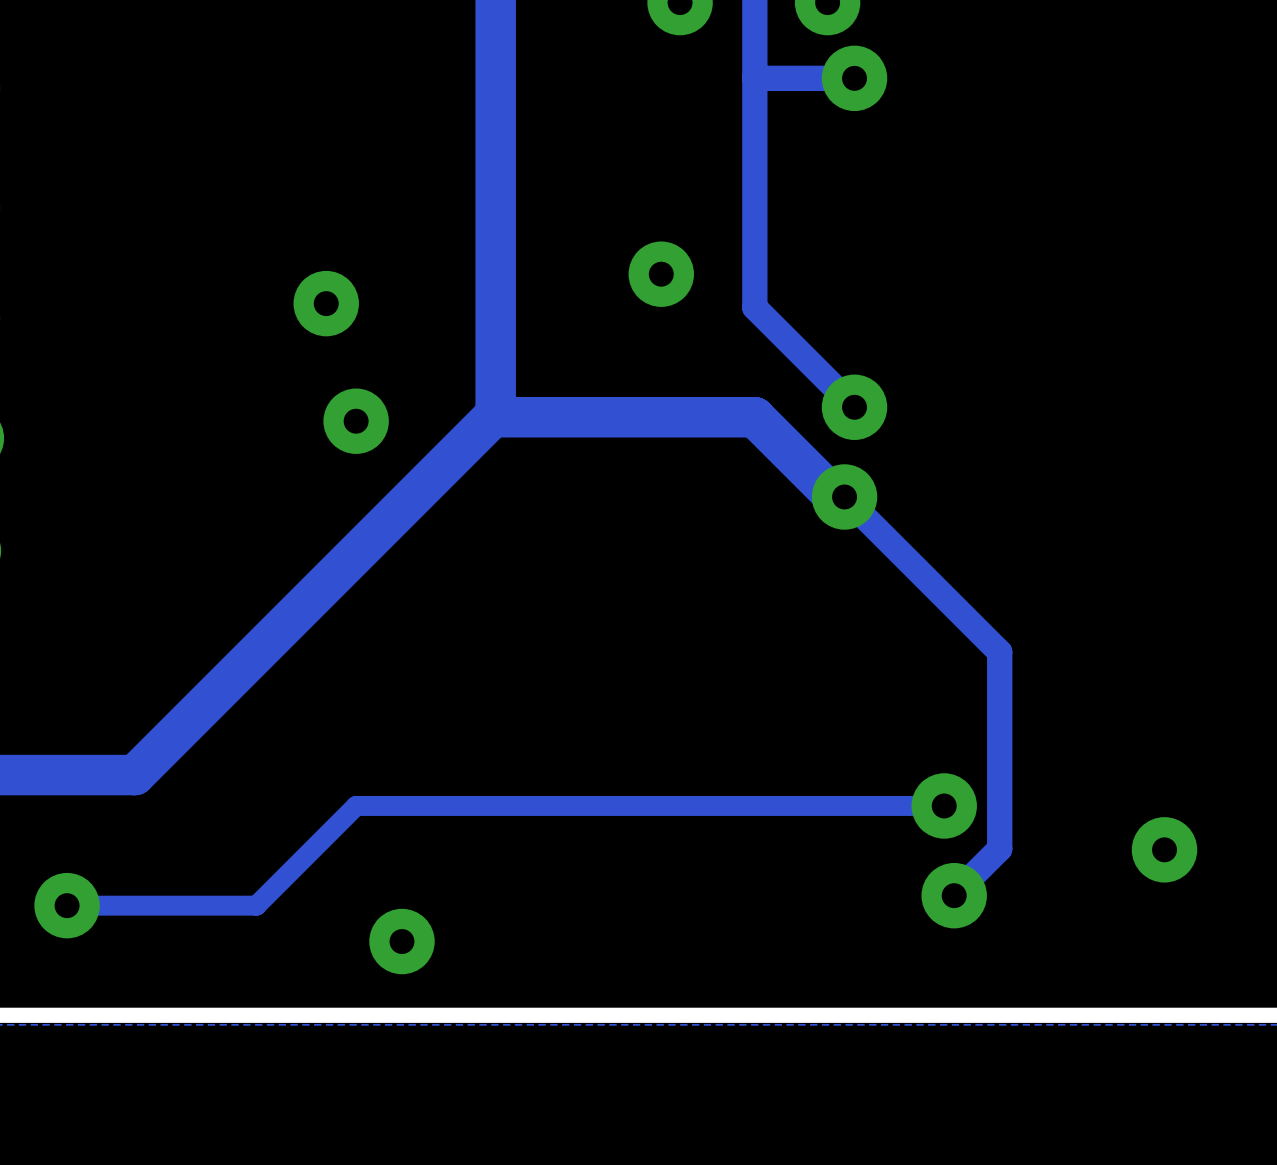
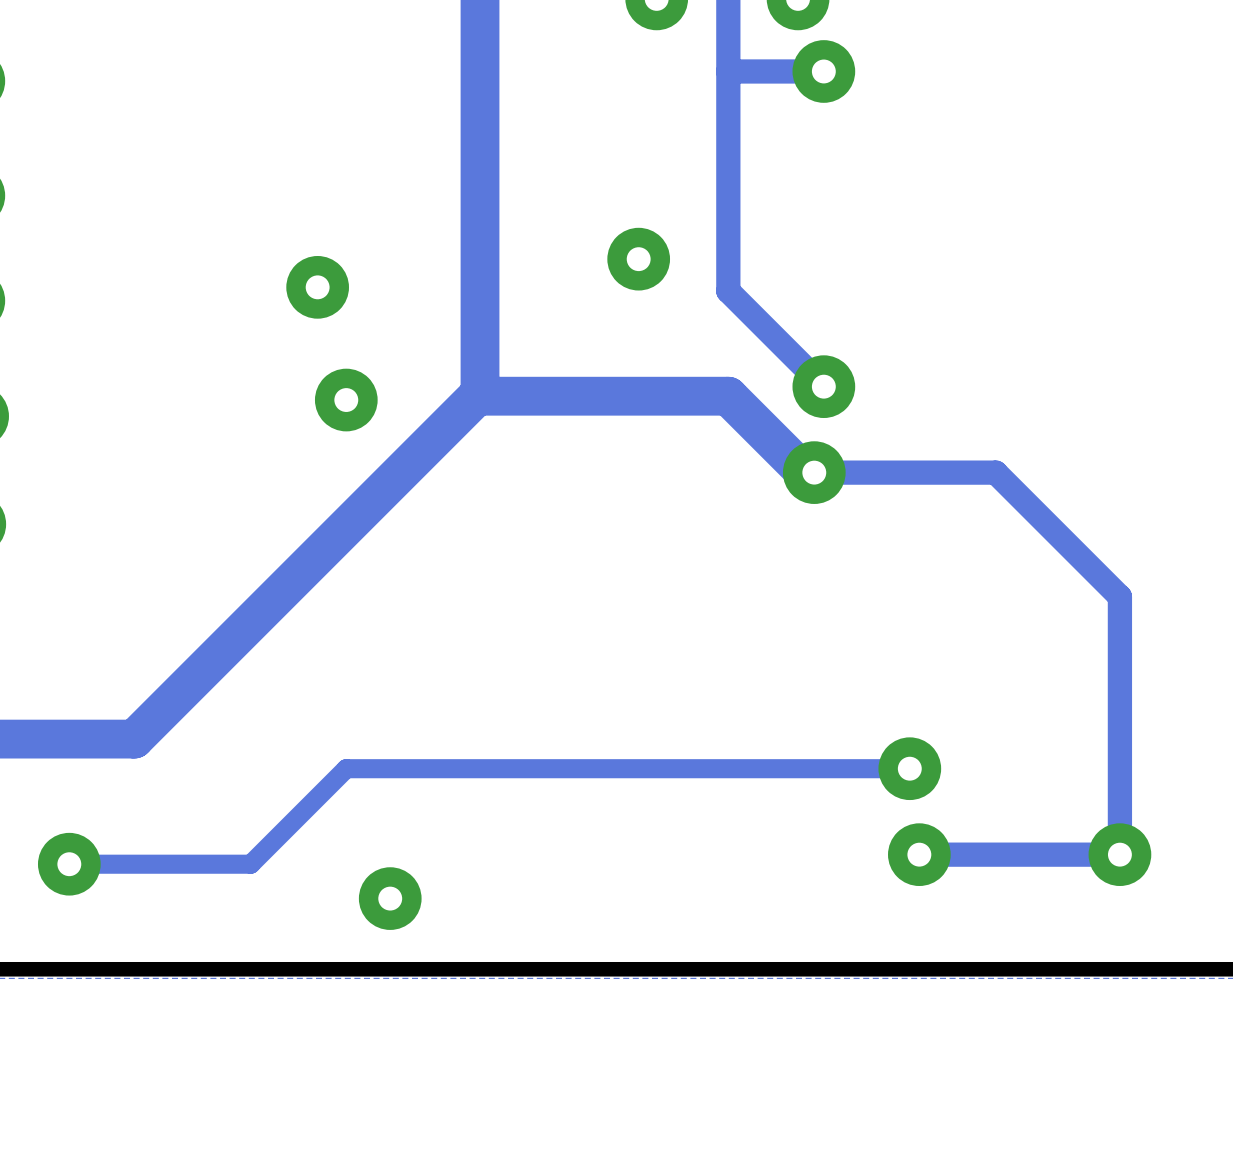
track: (844, 496) (999, 652) (999, 848) (954, 894) -> (804, 472) (995, 472) (1119, 596) (1119, 854) (919, 854)
via position: (1164, 849) -> (1119, 854)

